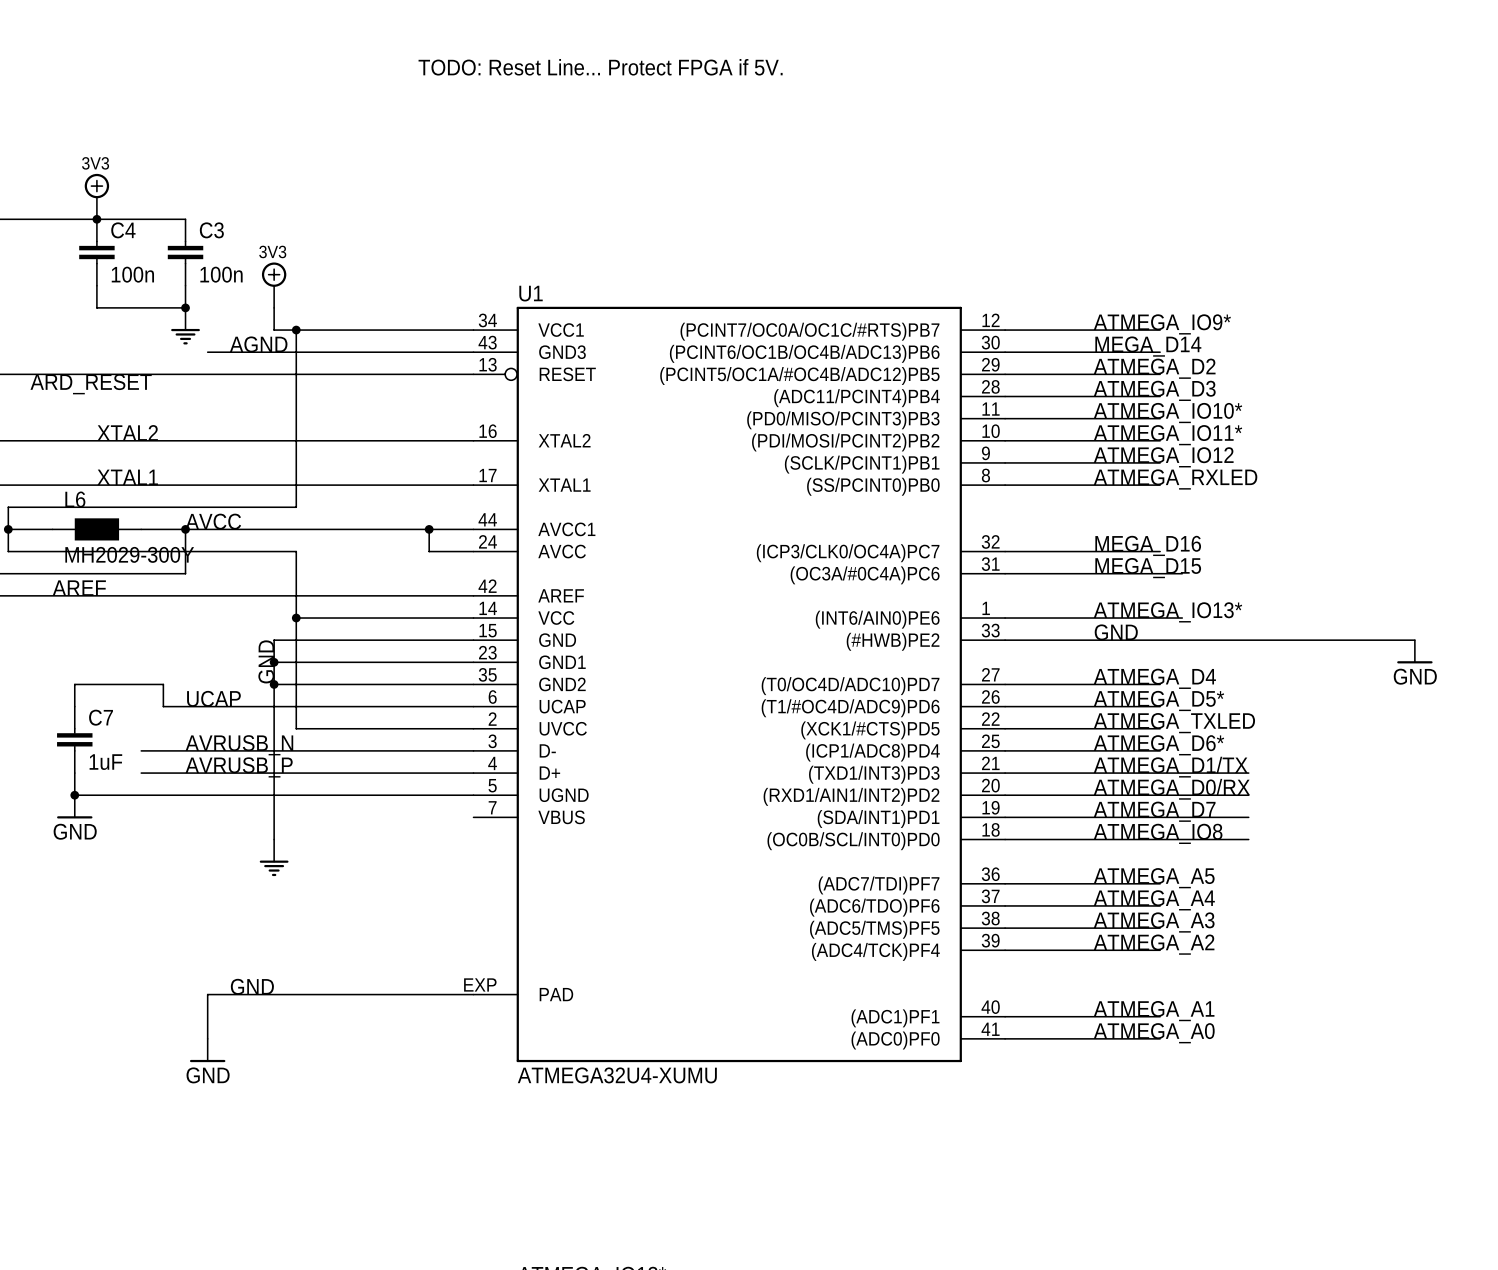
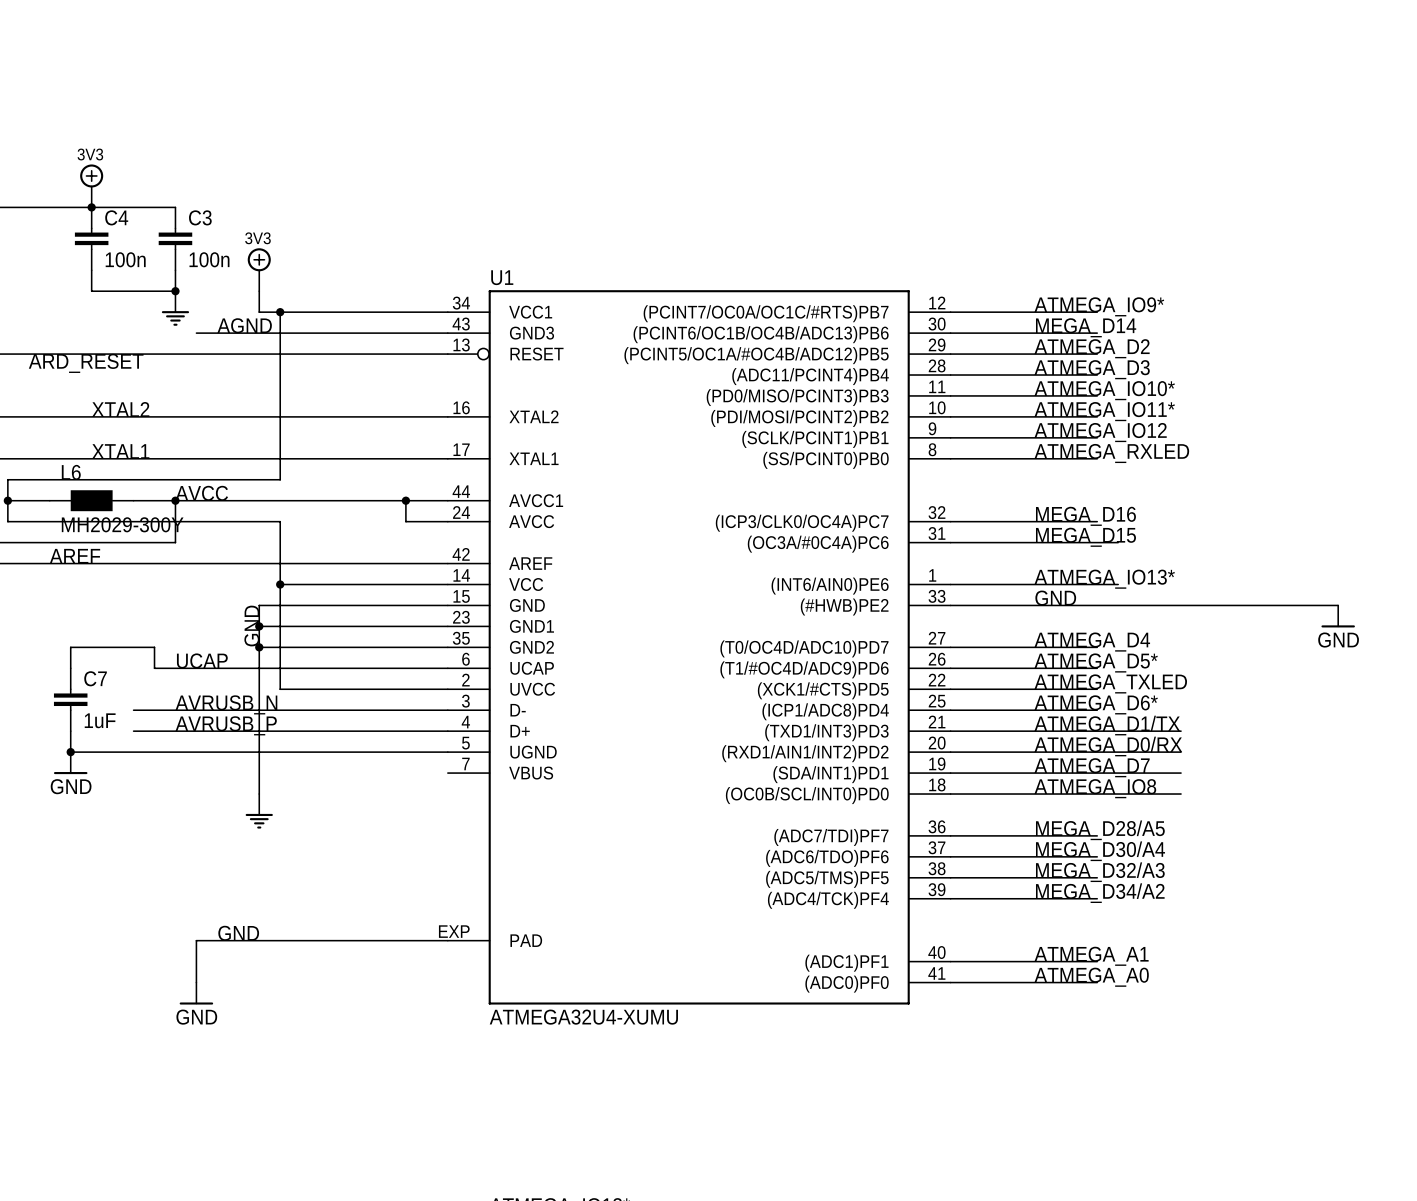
text: TODO: Reset Line... Protect FPGA if 5V. (600, 67) -> none
label: ATMEGA_A5 (1154, 878) -> MEGA_D28/A5 (1100, 830)
label: ATMEGA_A4 (1154, 900) -> MEGA_D30/A4 (1100, 851)
label: ATMEGA_A3 (1154, 922) -> MEGA_D32/A3 (1100, 872)
label: ATMEGA_A2 (1154, 944) -> MEGA_D34/A2 (1100, 893)

